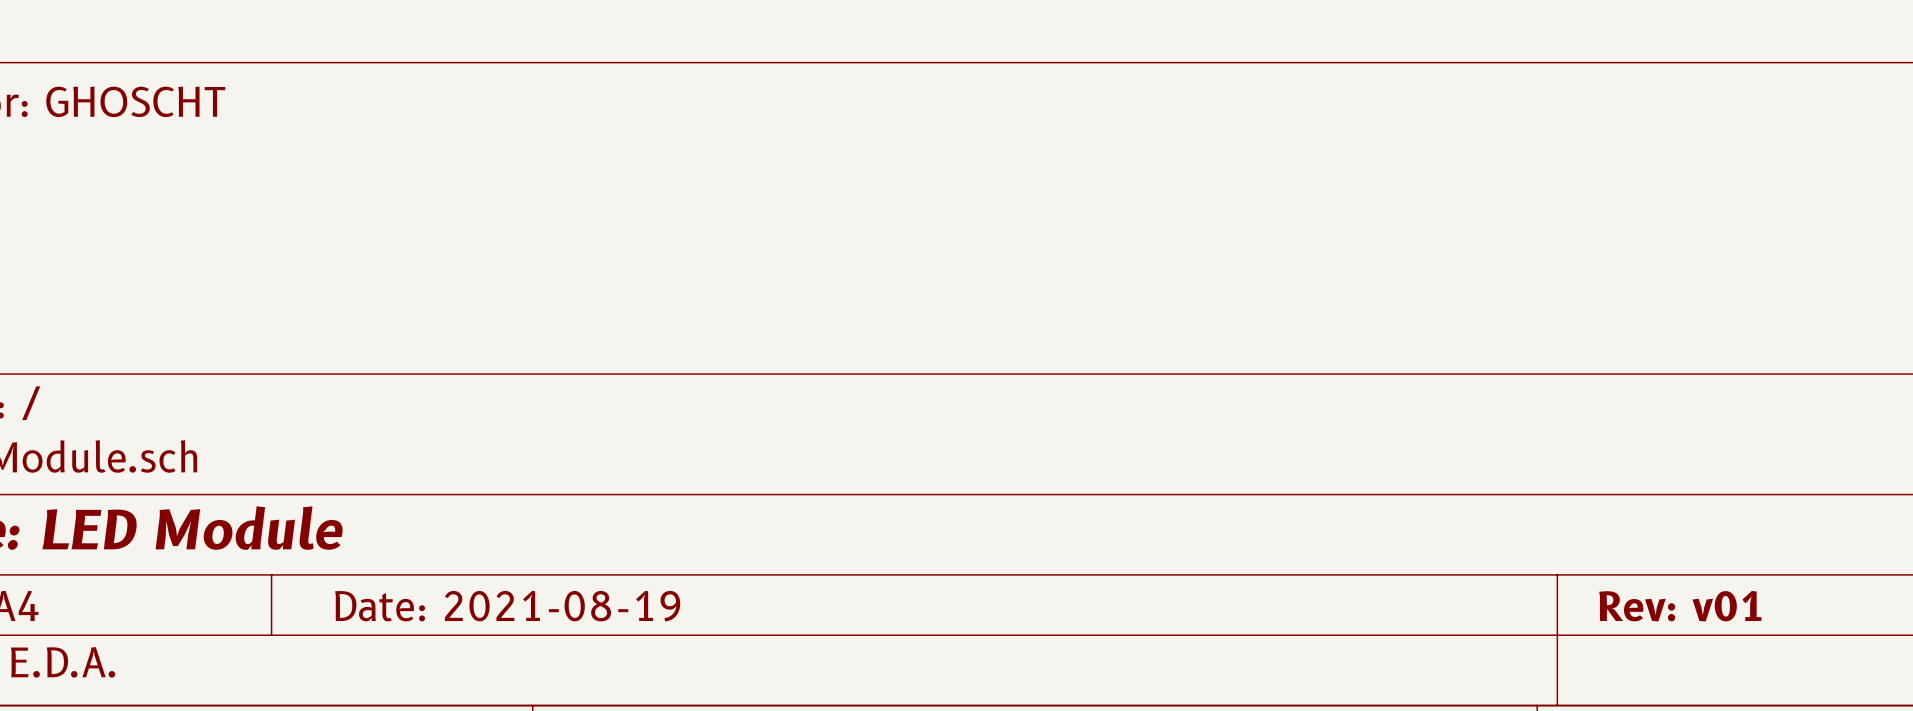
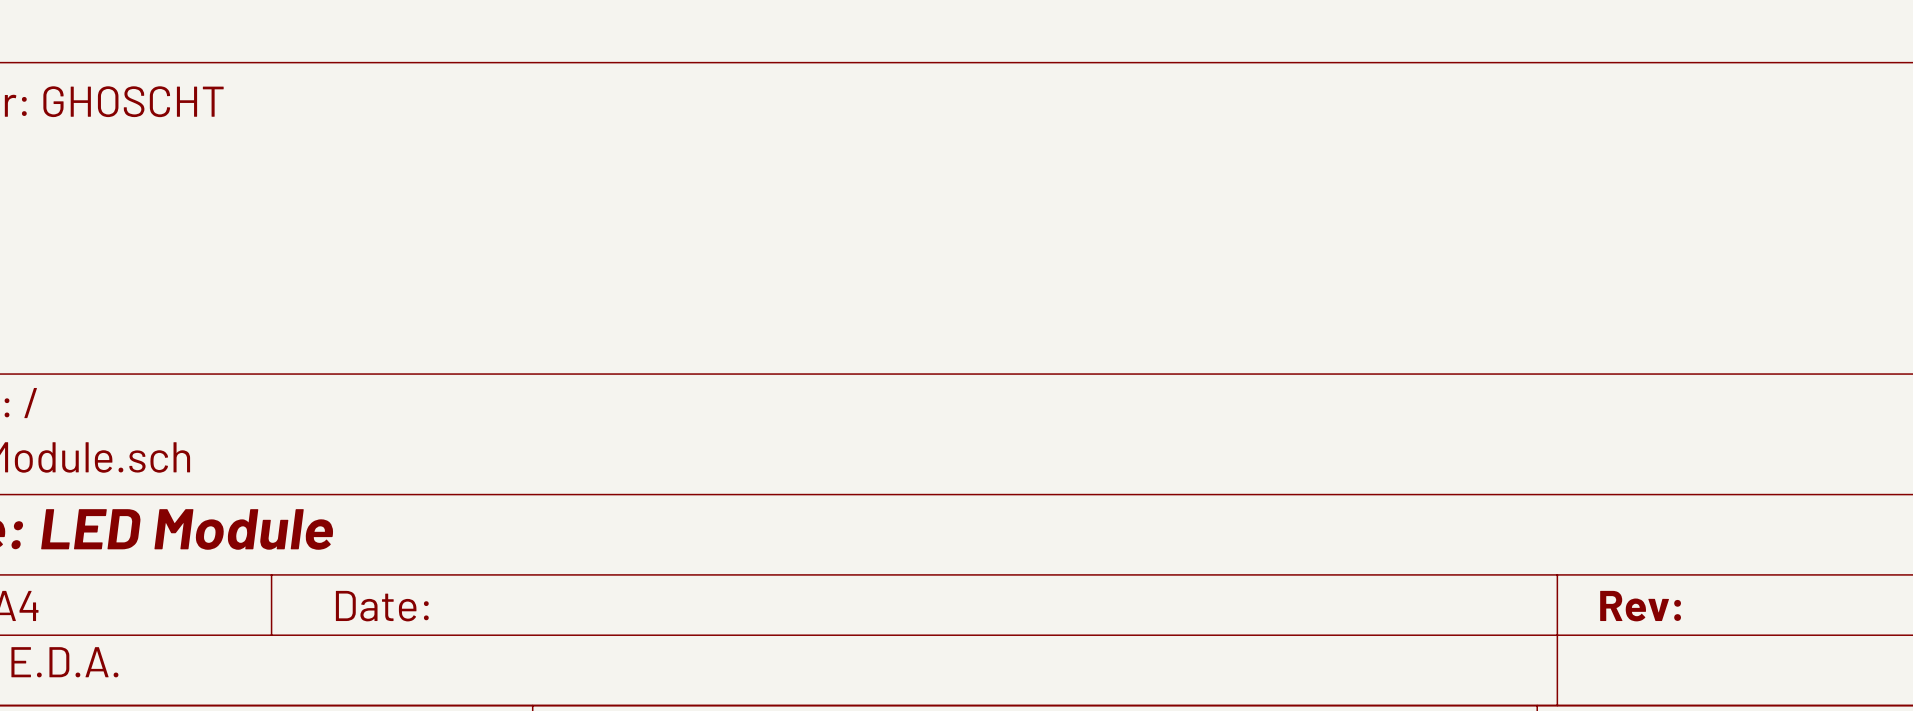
title block: Date: 2021-08-19 (507, 606) -> Date: (382, 606)
title block: Rev: v01 (1680, 606) -> Rev: (1640, 606)

